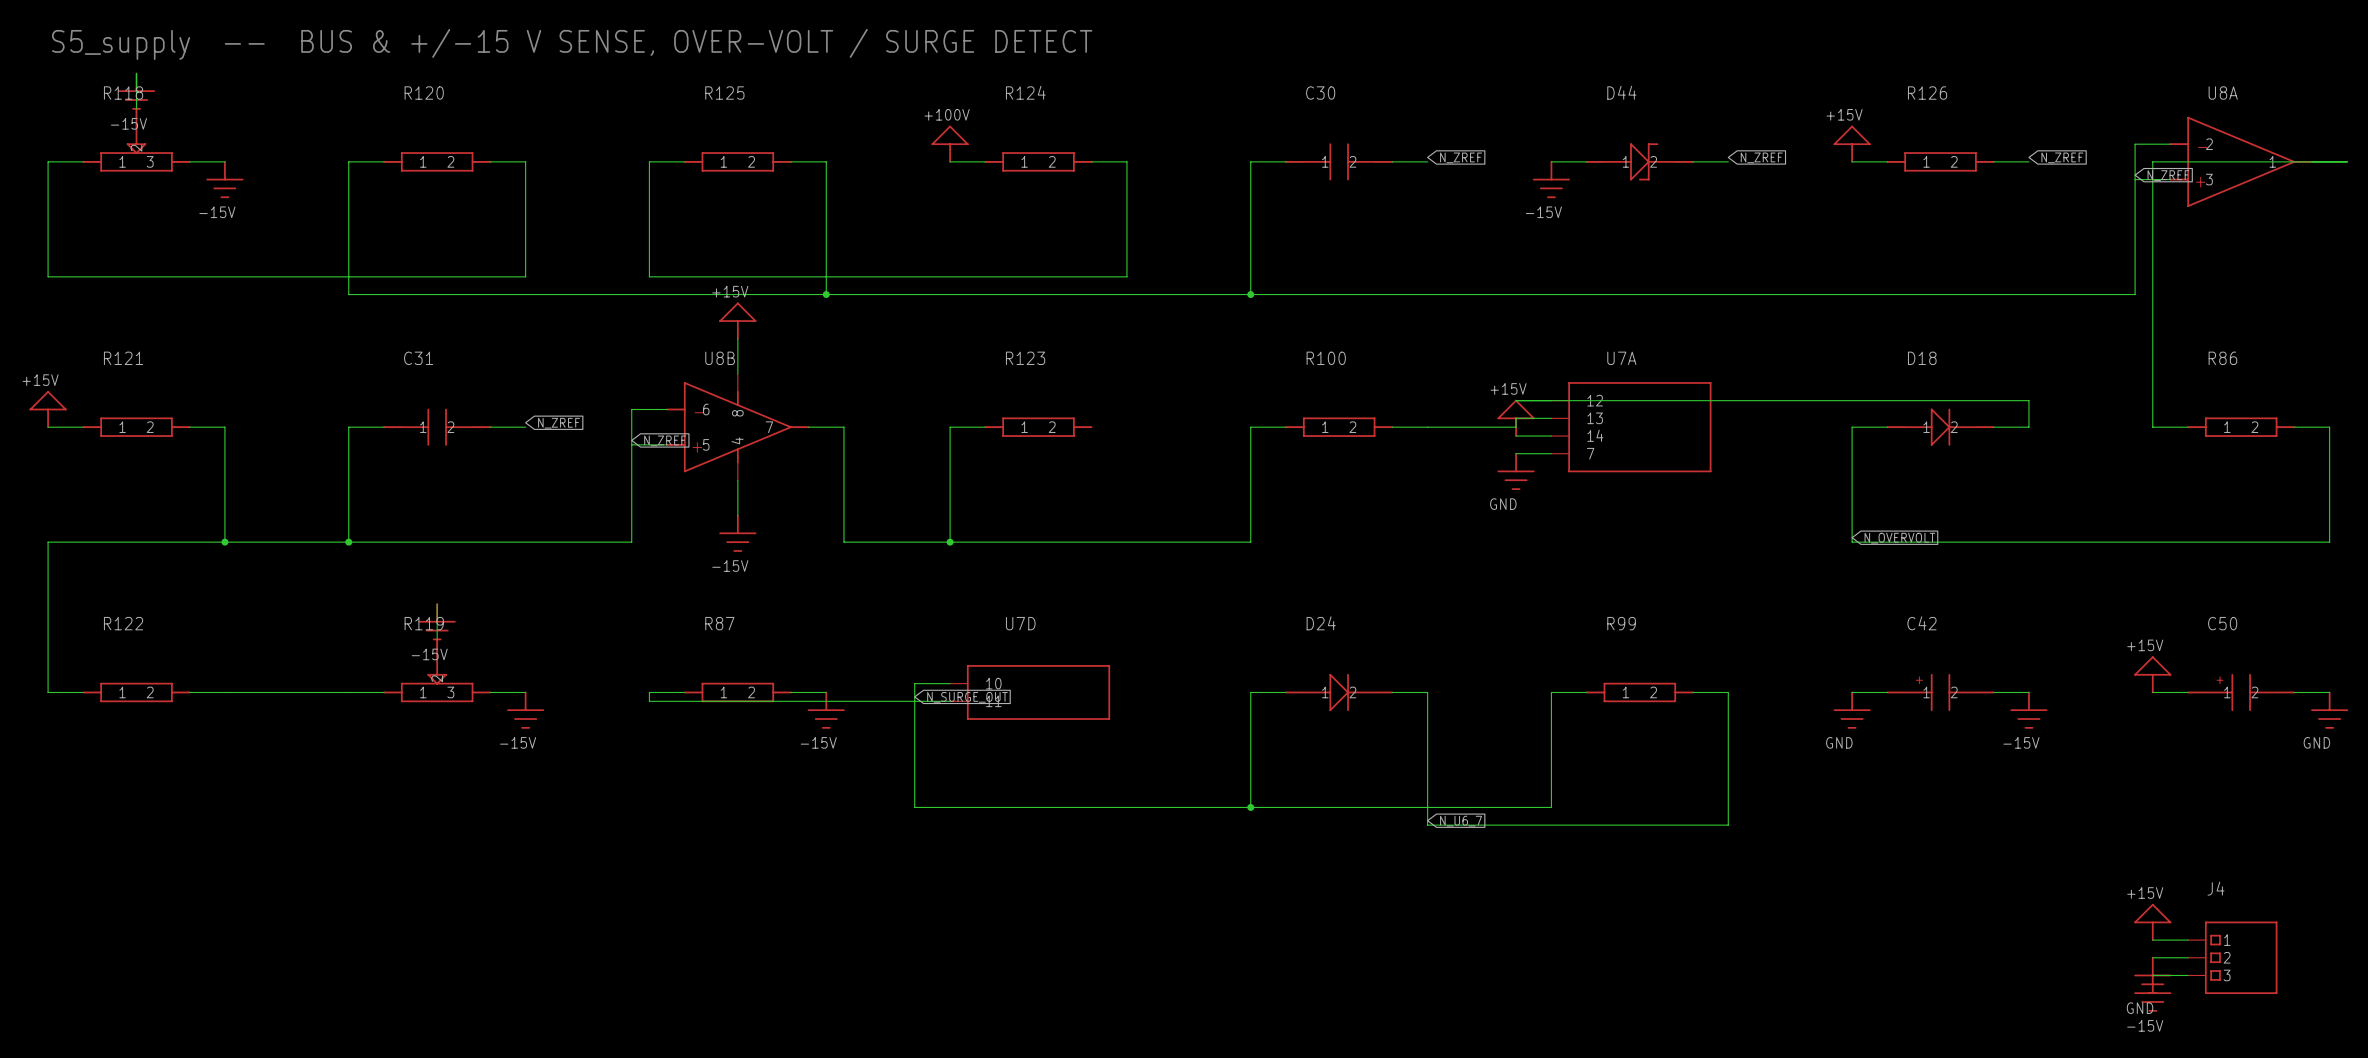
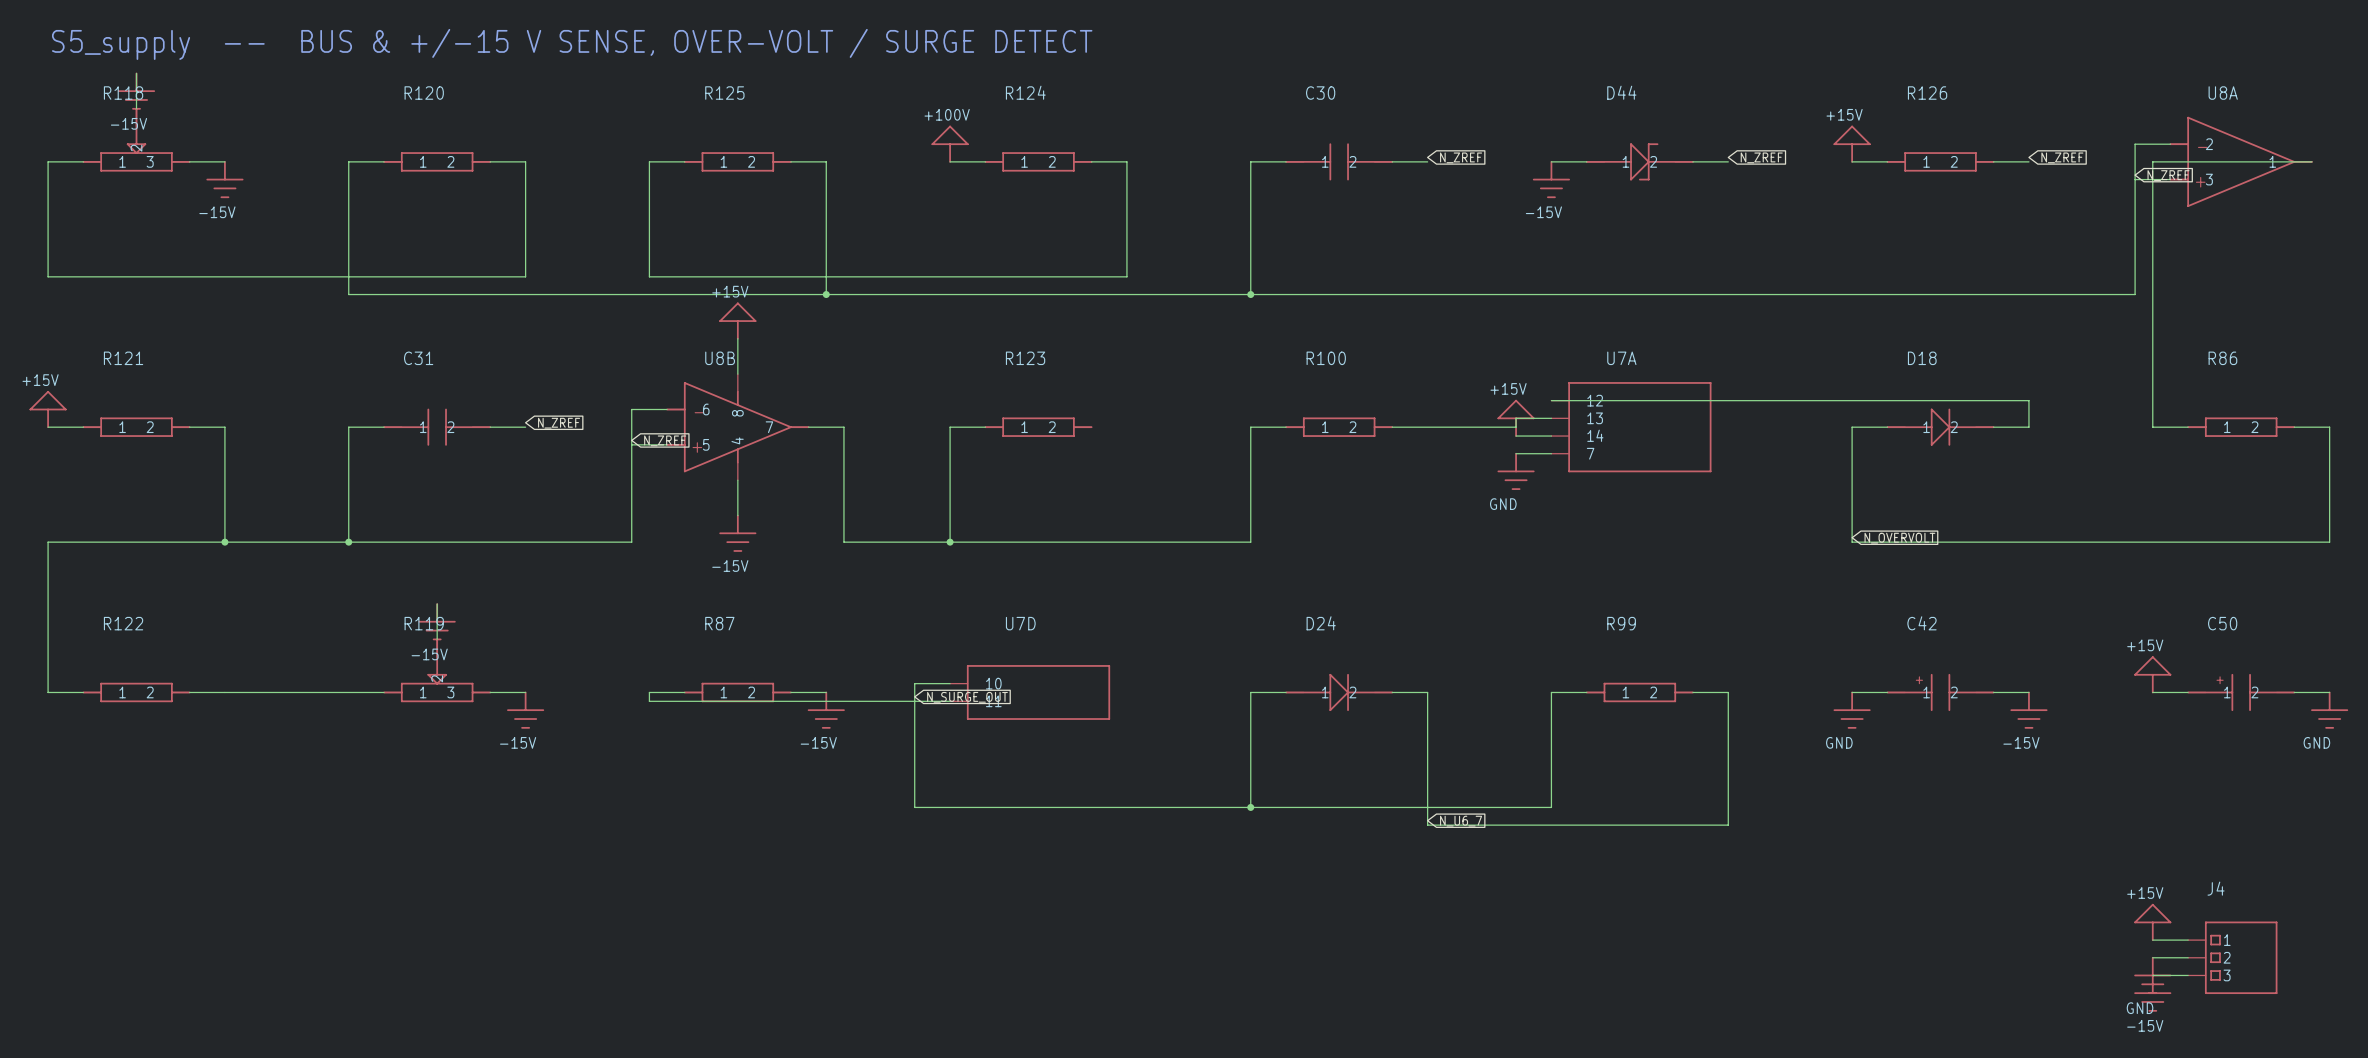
wire: (2311, 161) (2347, 161) -> none
wire: (1516, 400) (1551, 400) -> none

